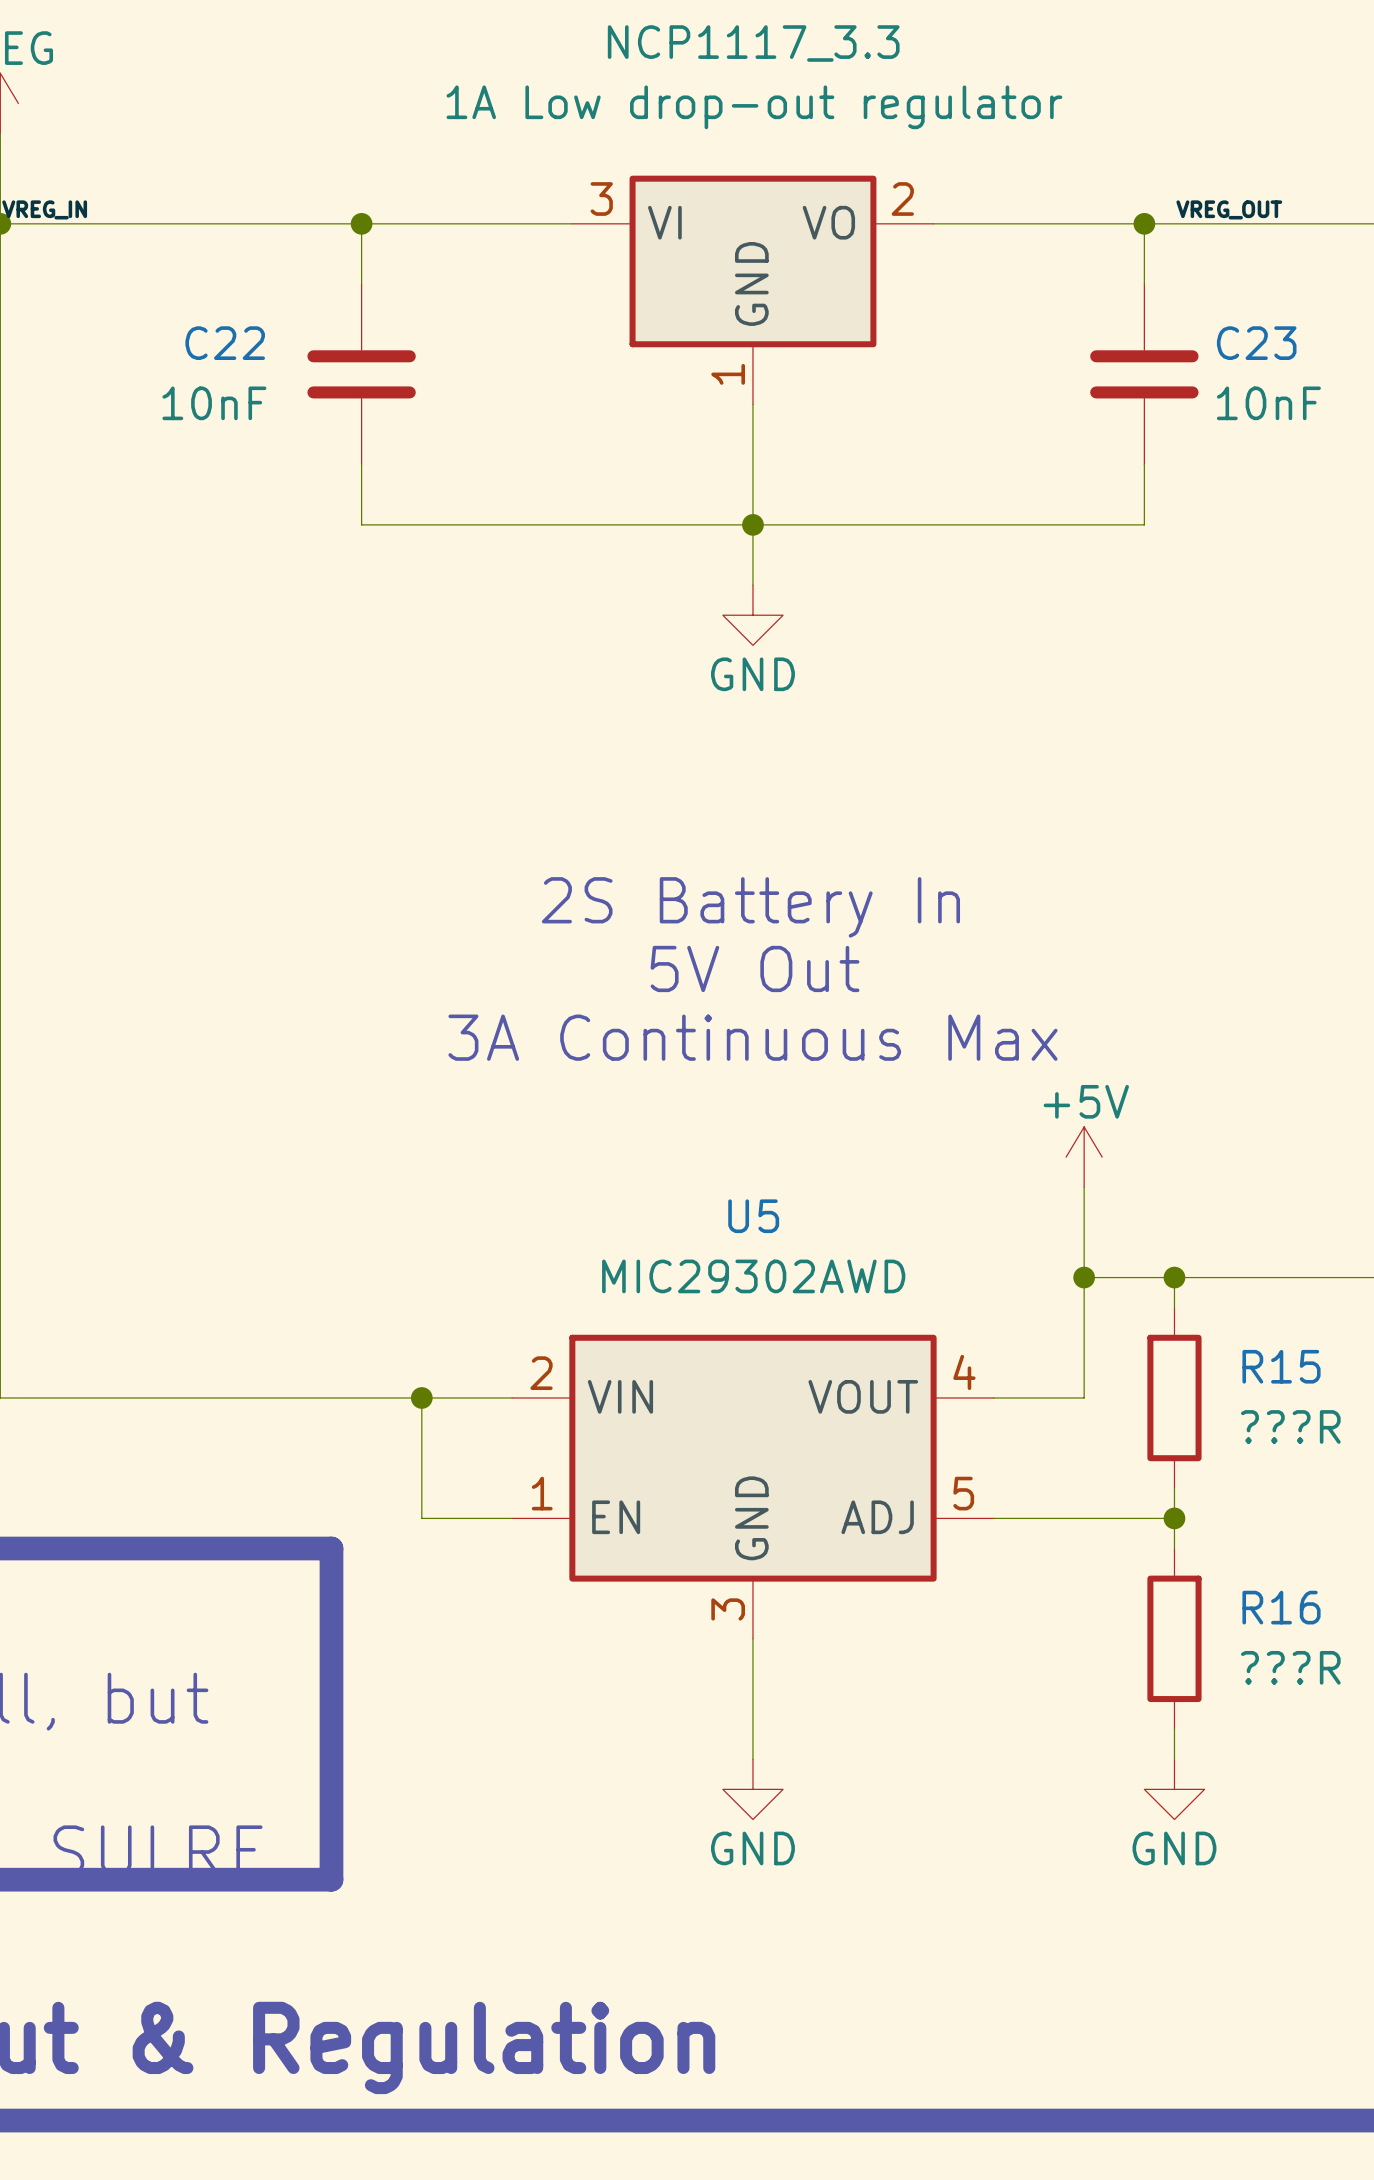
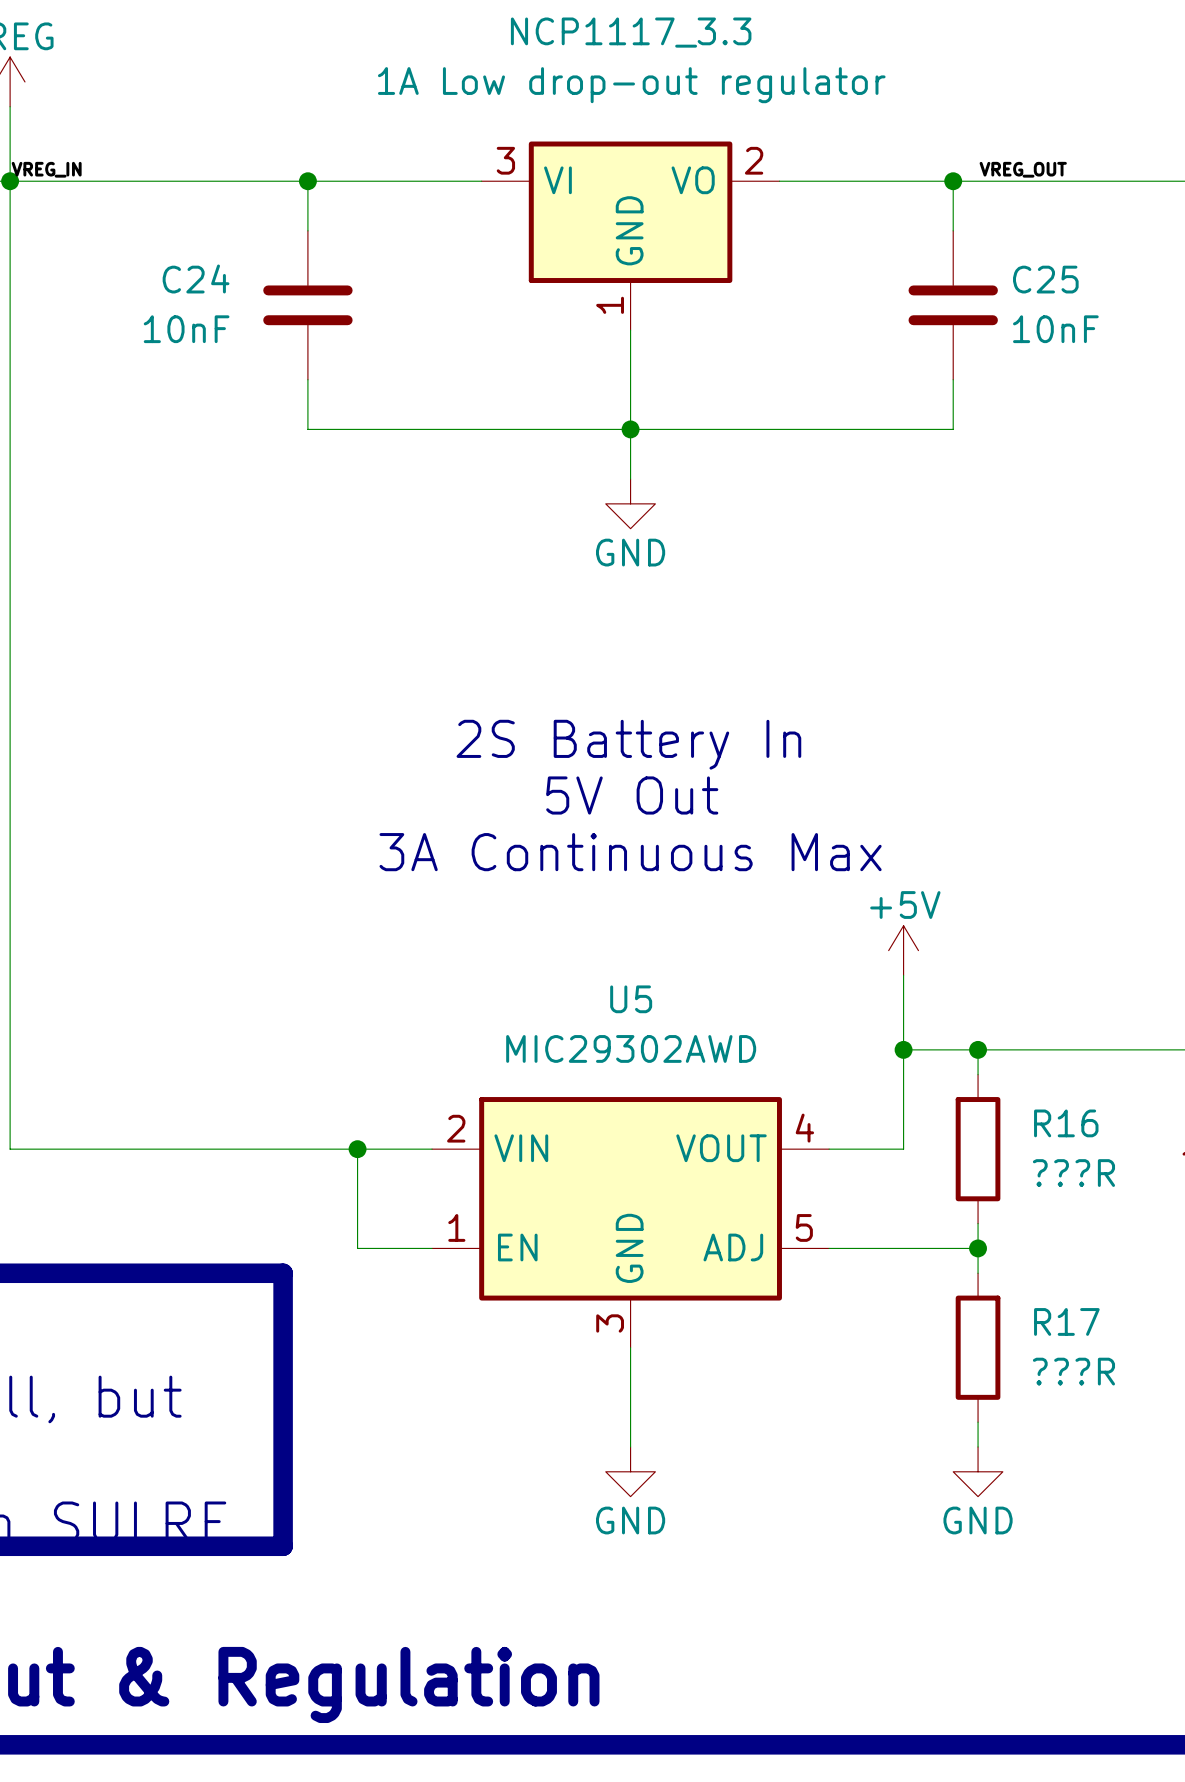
C22 name: C22 (225, 343) -> C24 (196, 278)
C23 name: C23 (1256, 343) -> C25 (1045, 279)
R15 name: R15 (1281, 1366) -> R16 (1066, 1123)
R16 name: R16 (1281, 1607) -> R17 (1066, 1321)

